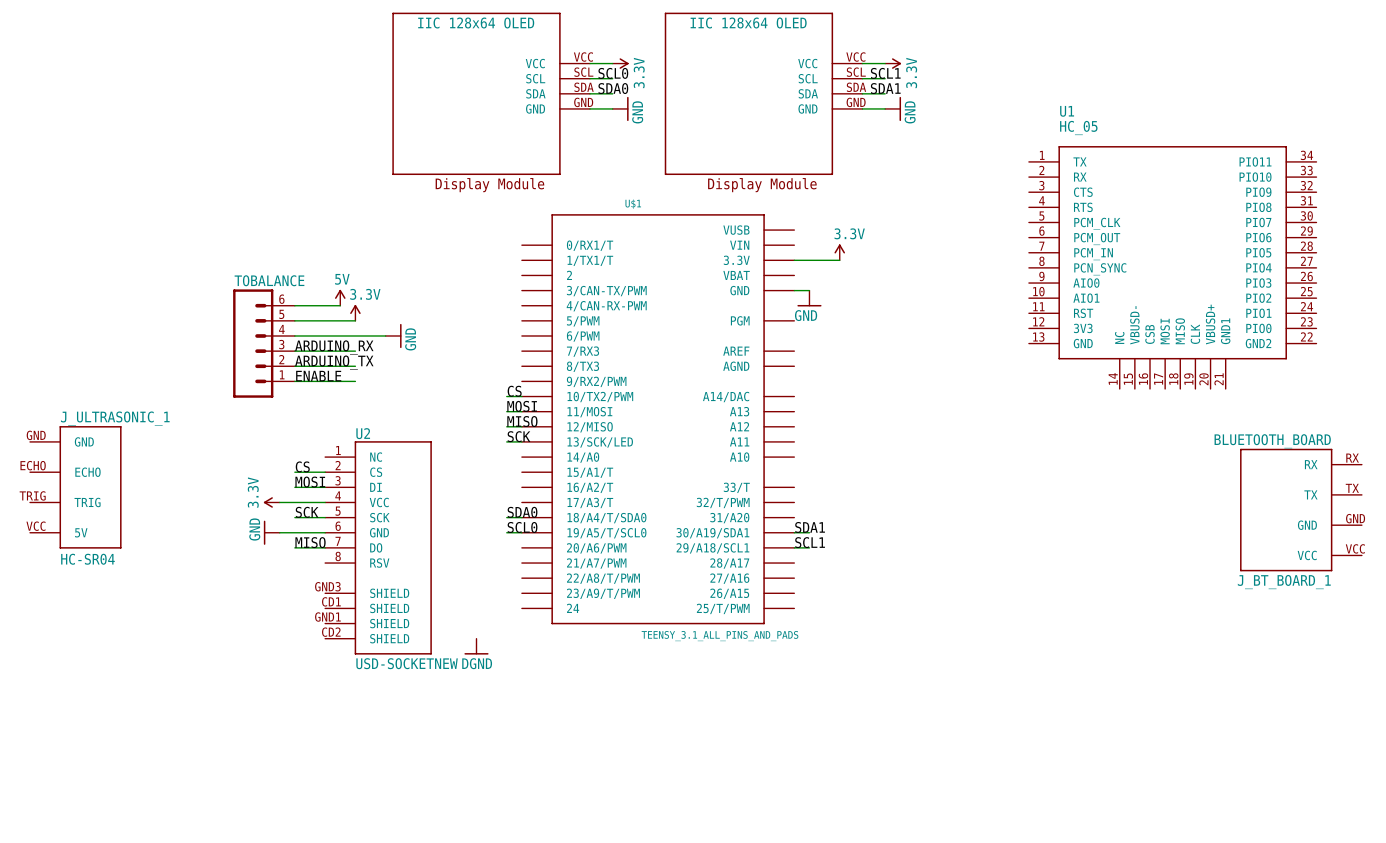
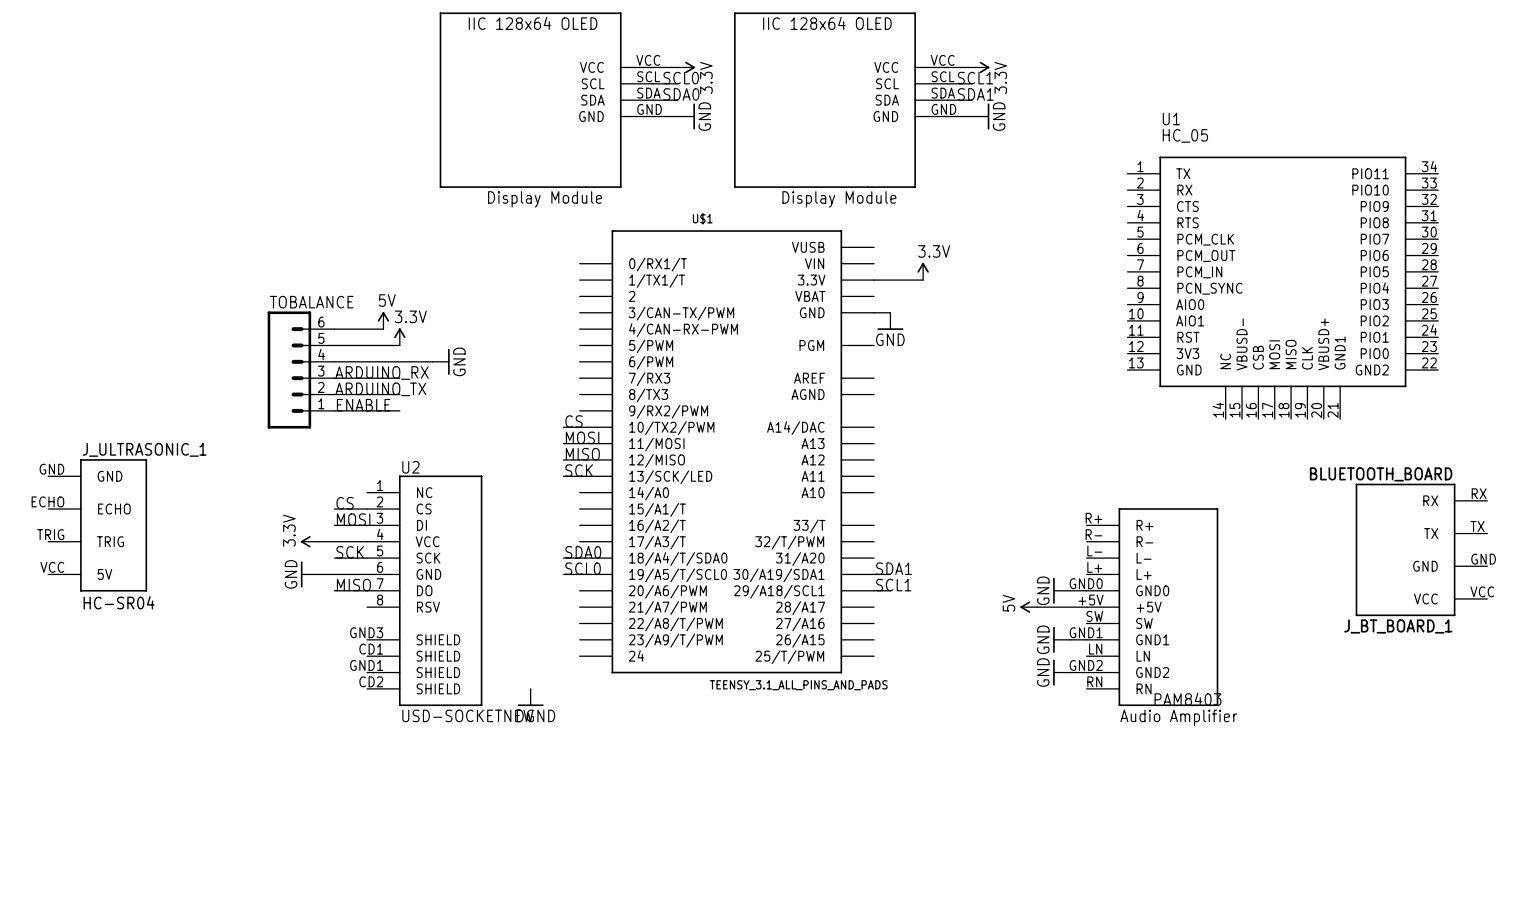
power symbol: none -> GND (1061, 590)
wire: none -> (1070, 590) (1086, 590)
power symbol: none -> 5V (1029, 607)
wire: none -> (1037, 607) (1086, 607)
part: none -> (1152, 607)
power symbol: none -> GND (1061, 639)
wire: none -> (1070, 639) (1086, 639)
power symbol: none -> GND (1061, 672)
wire: none -> (1070, 672) (1086, 672)

